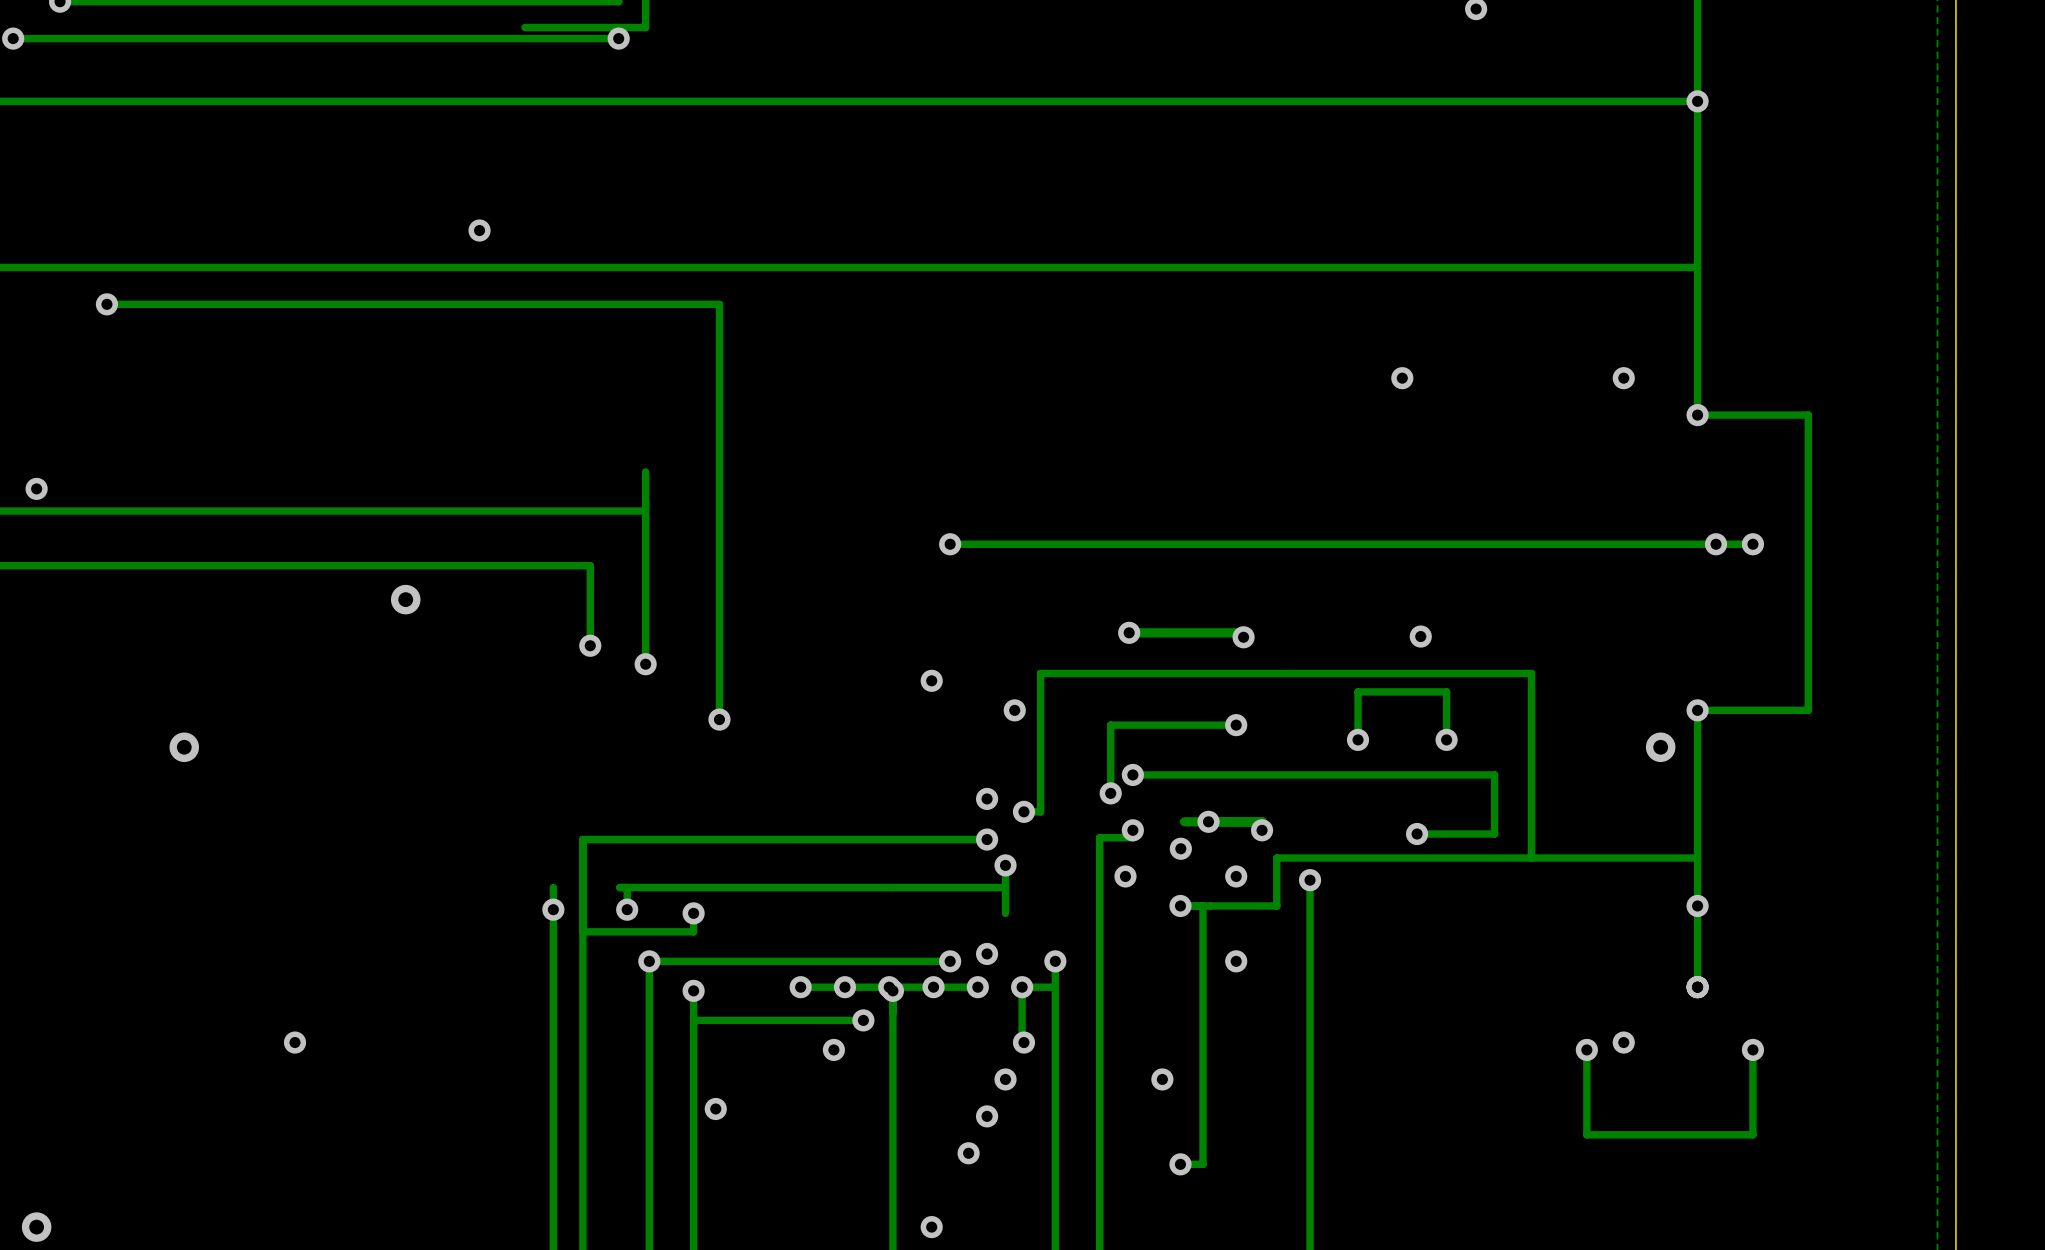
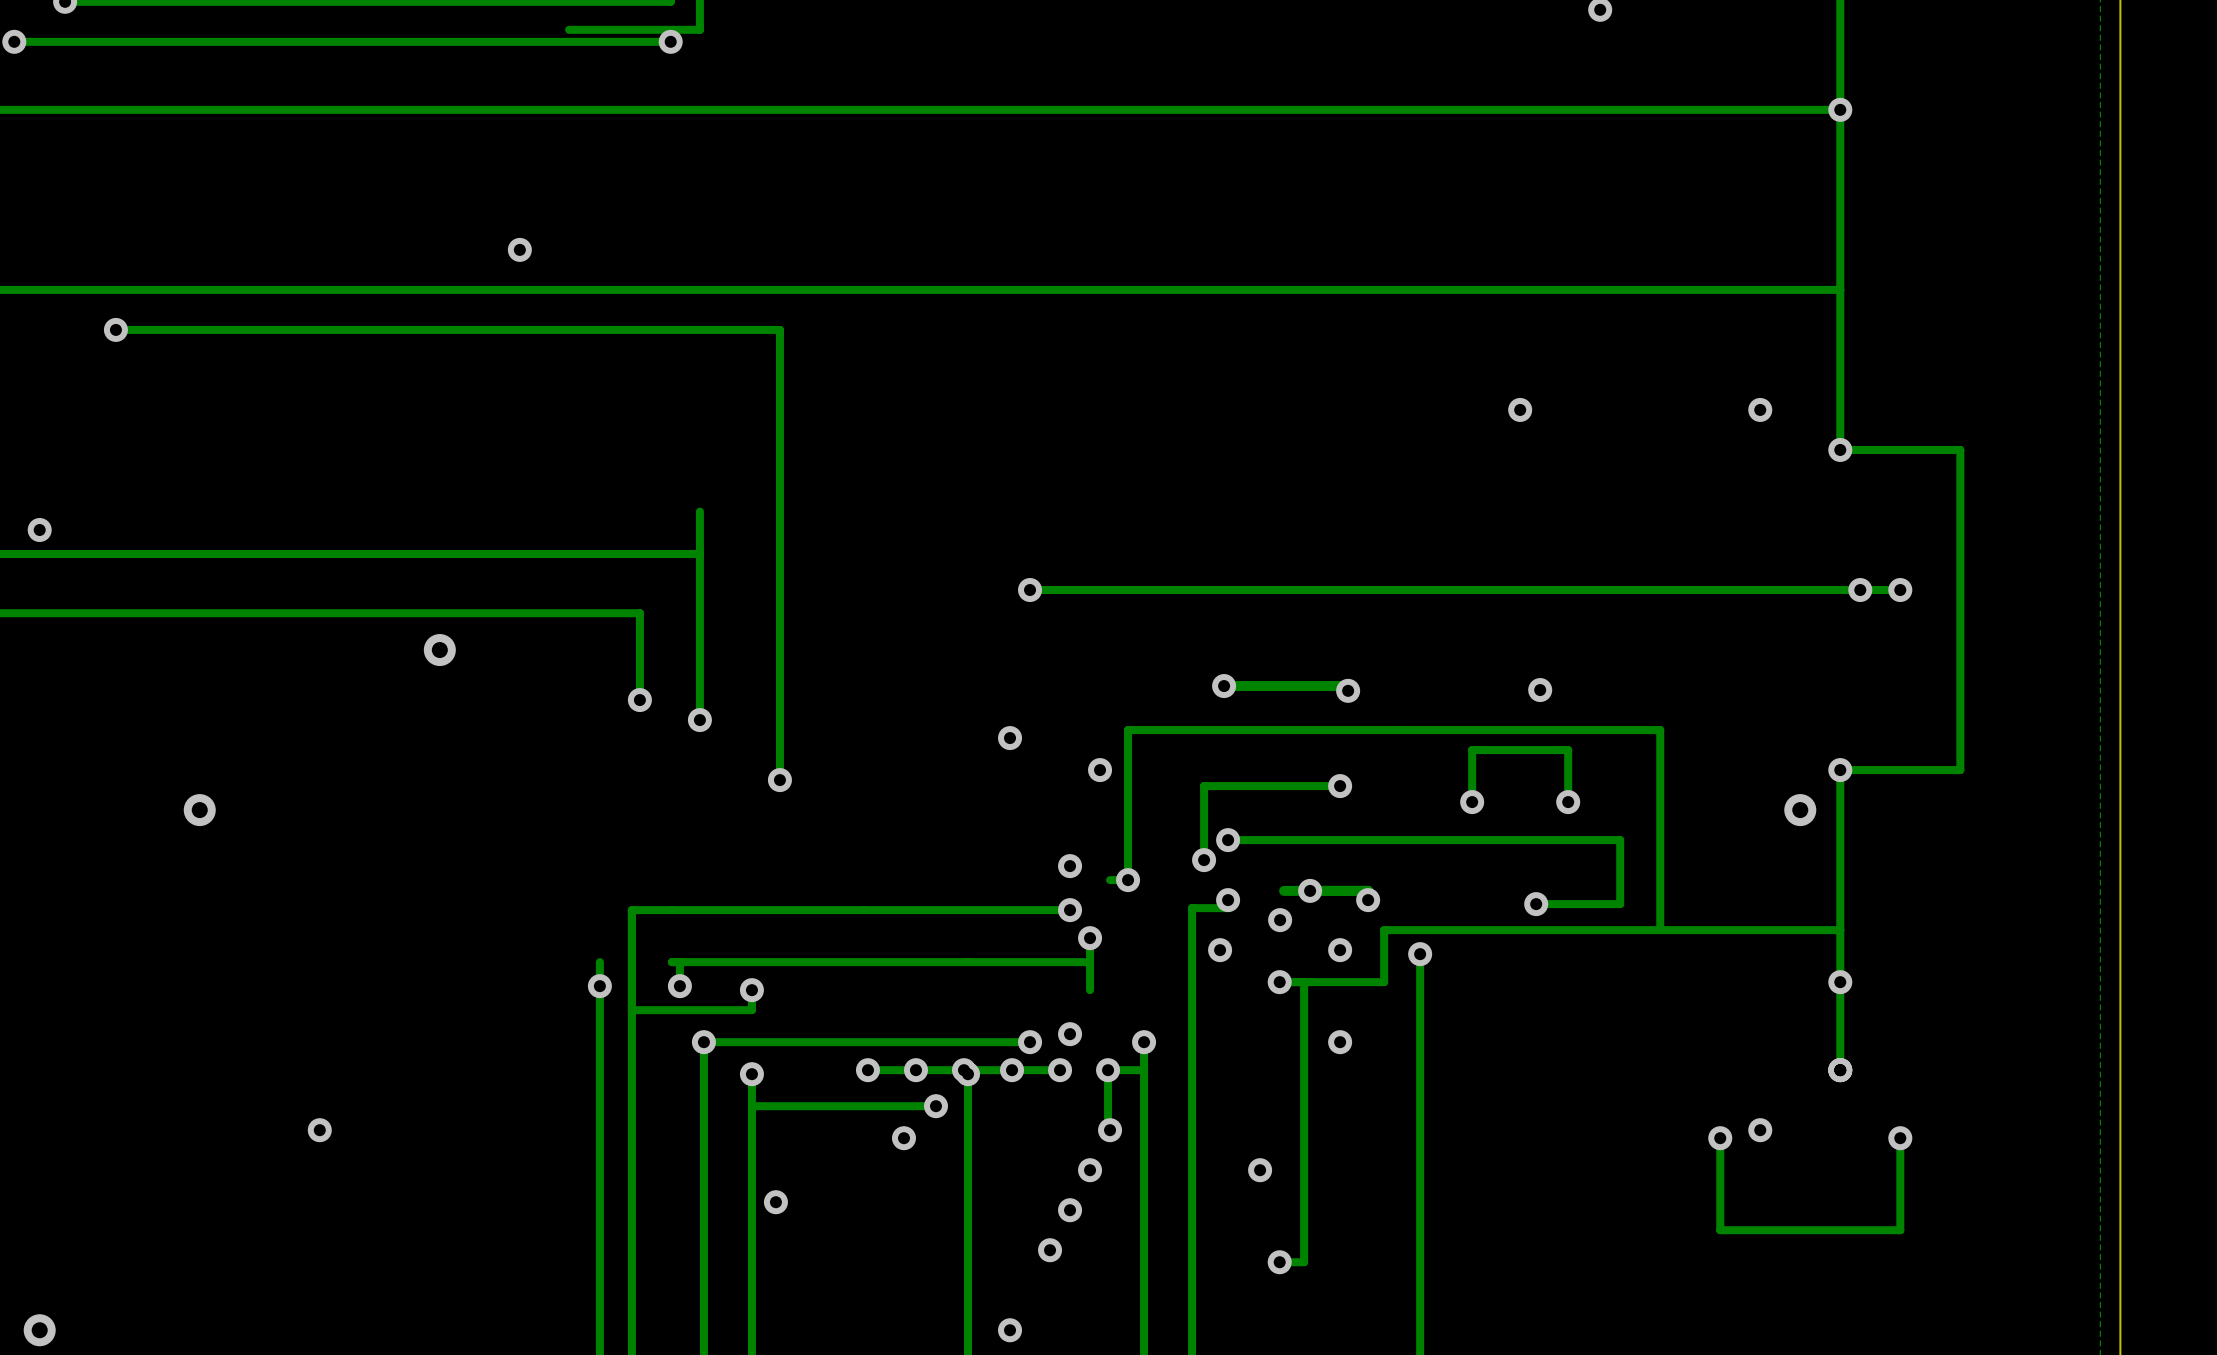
via position: (1023, 811) -> (1128, 880)

